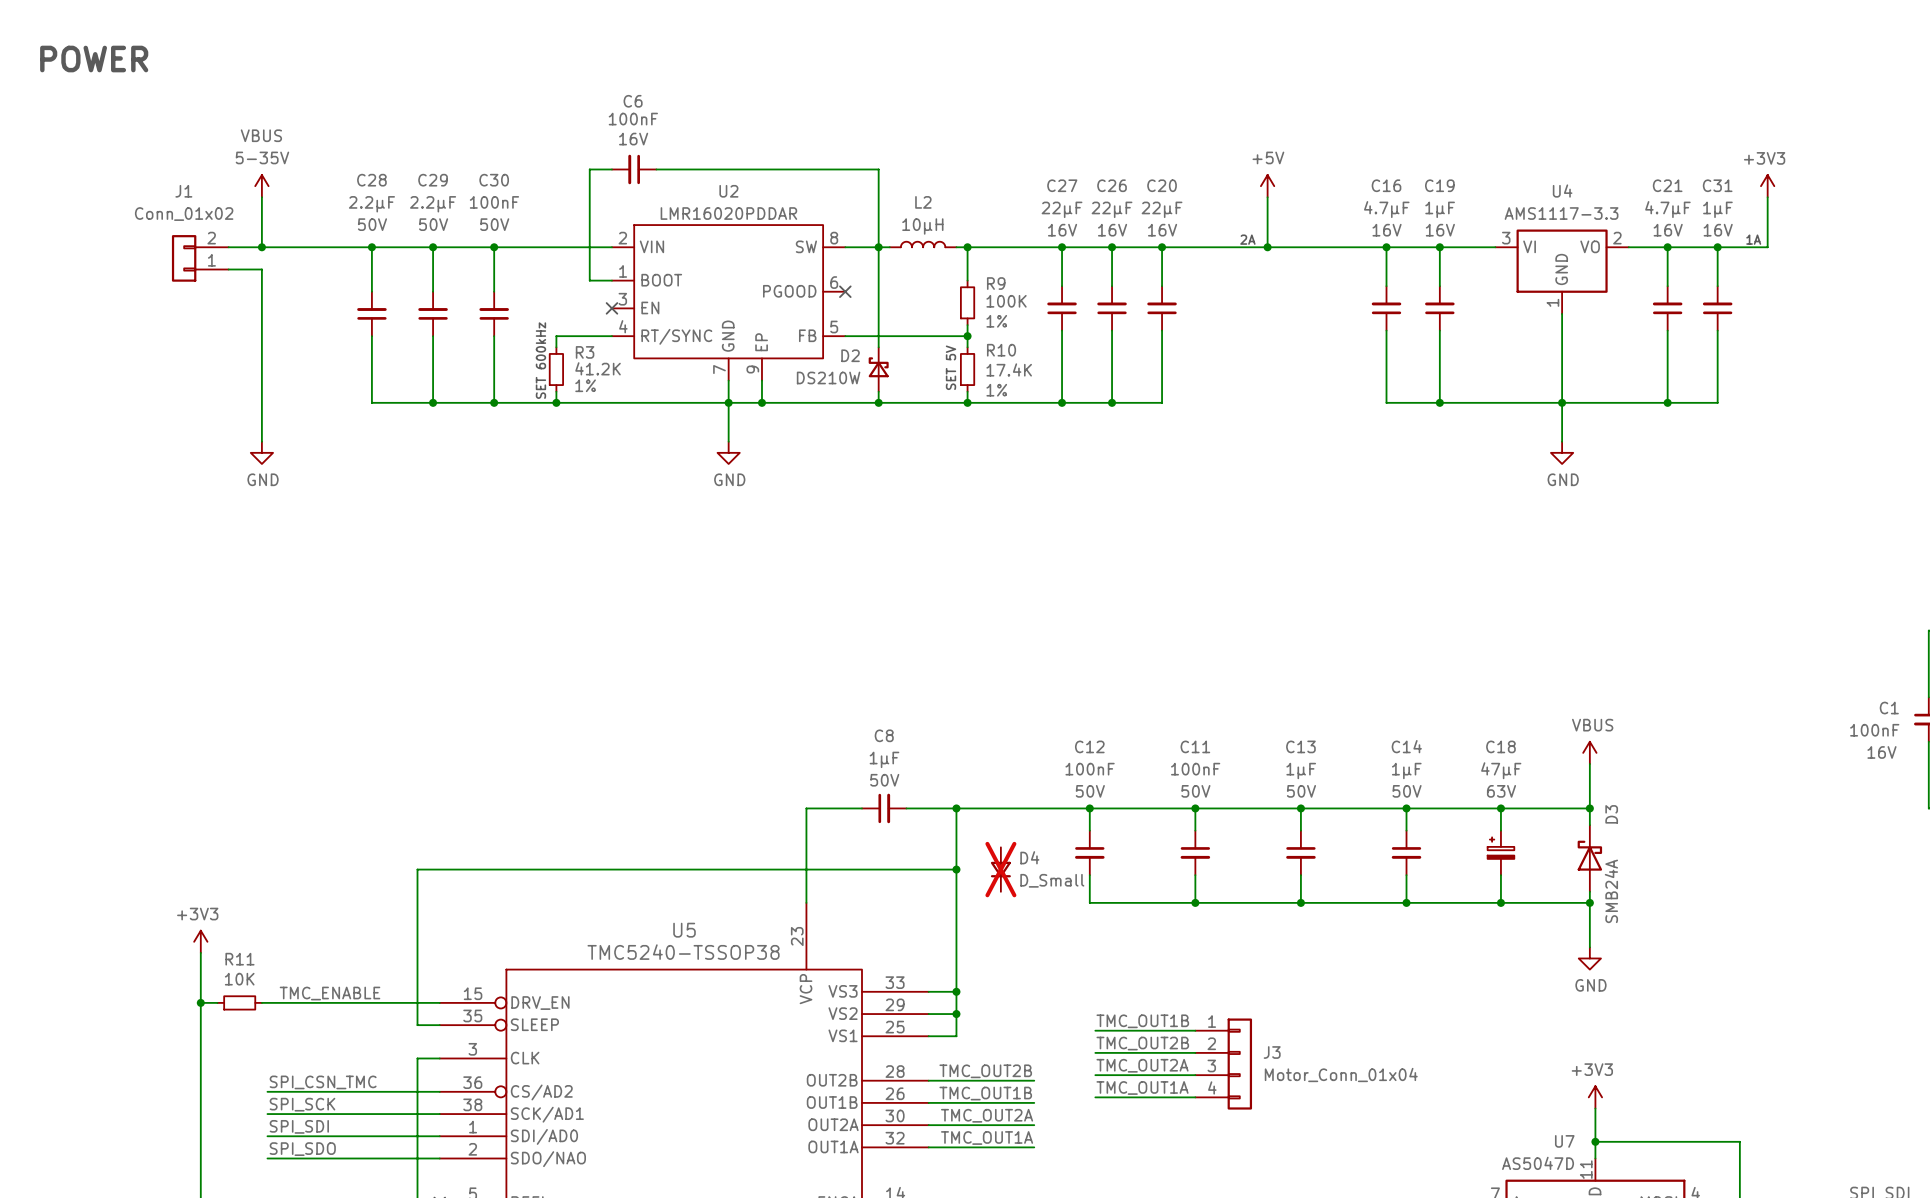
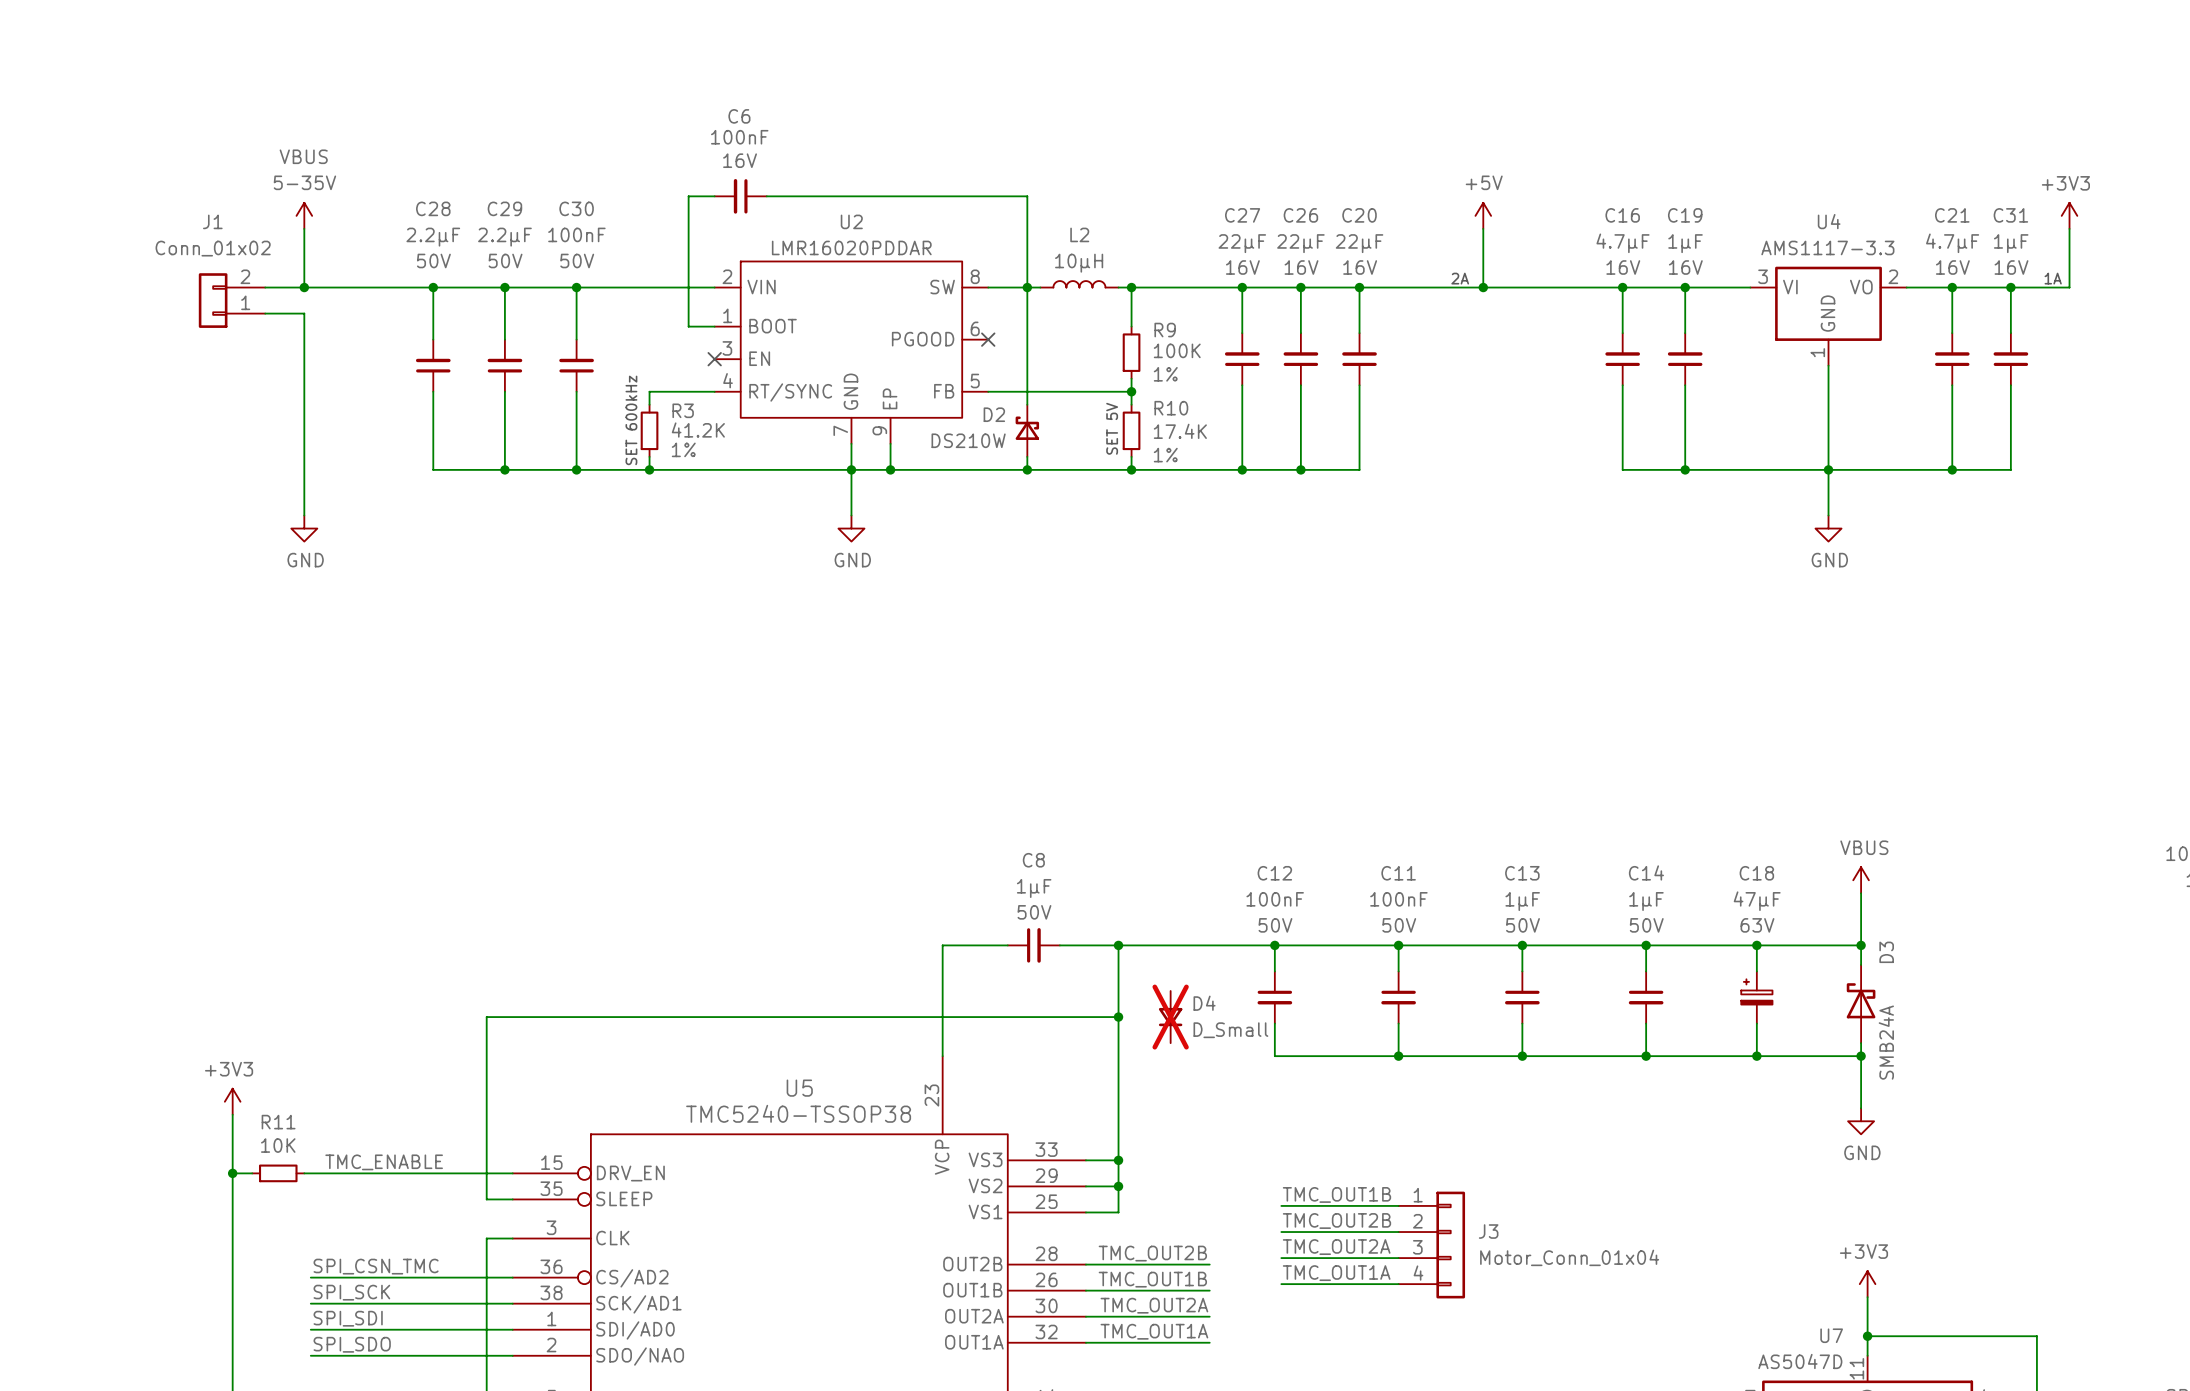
text: POWER (94, 59) -> none

